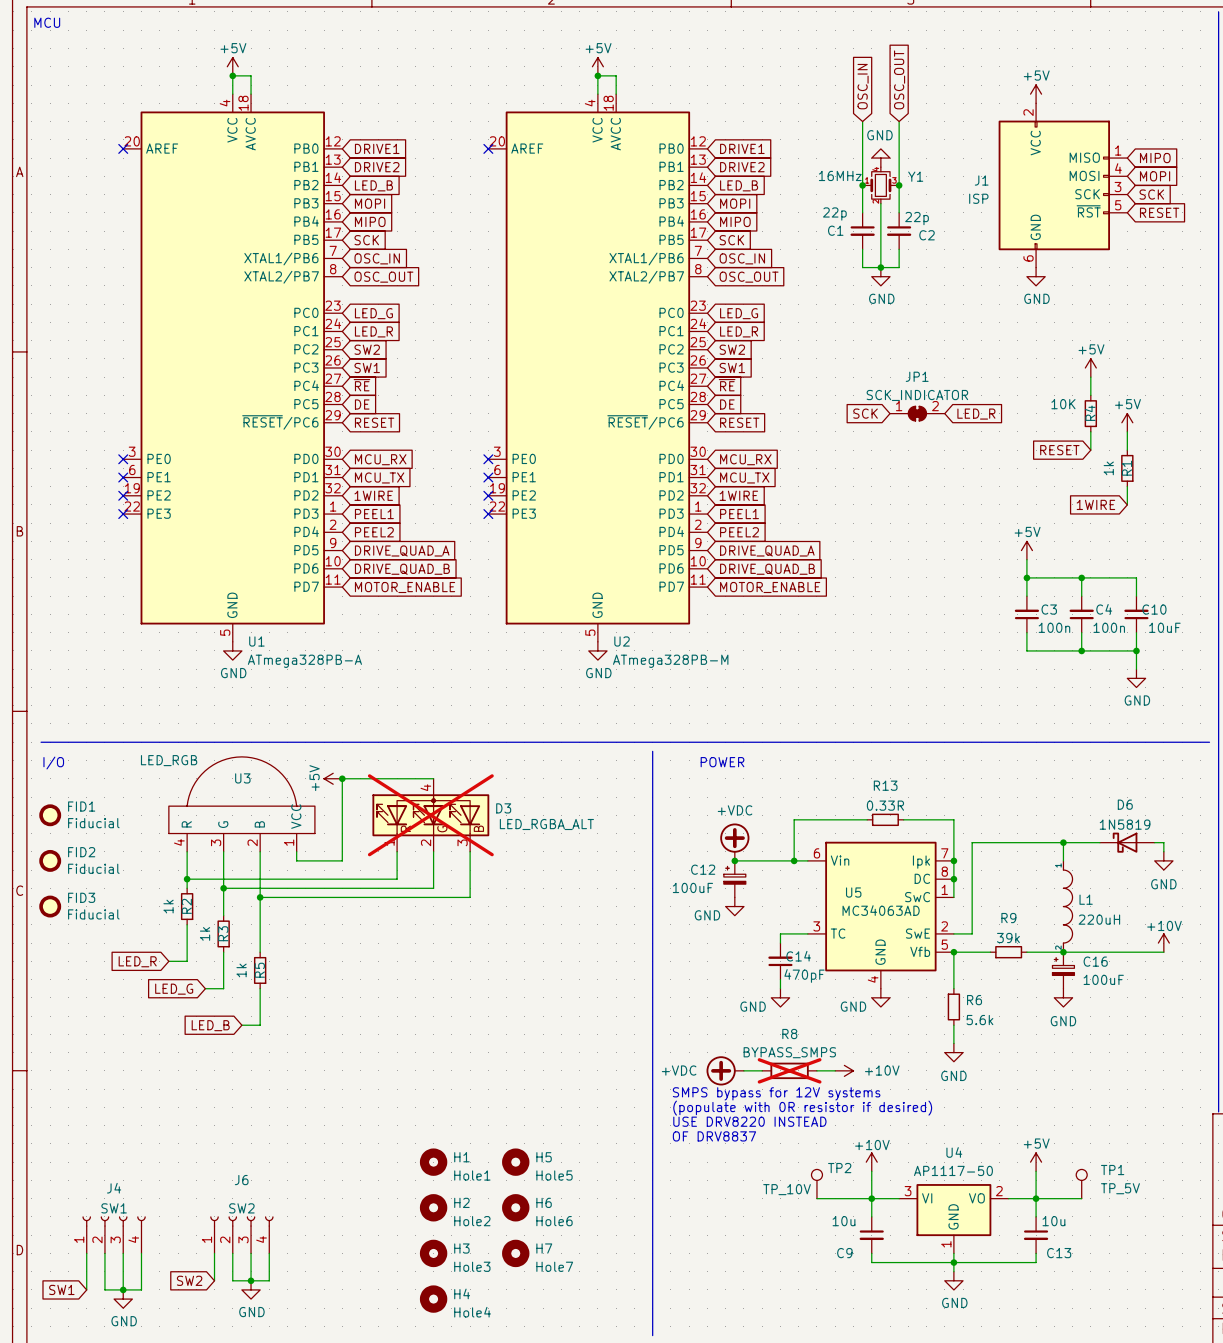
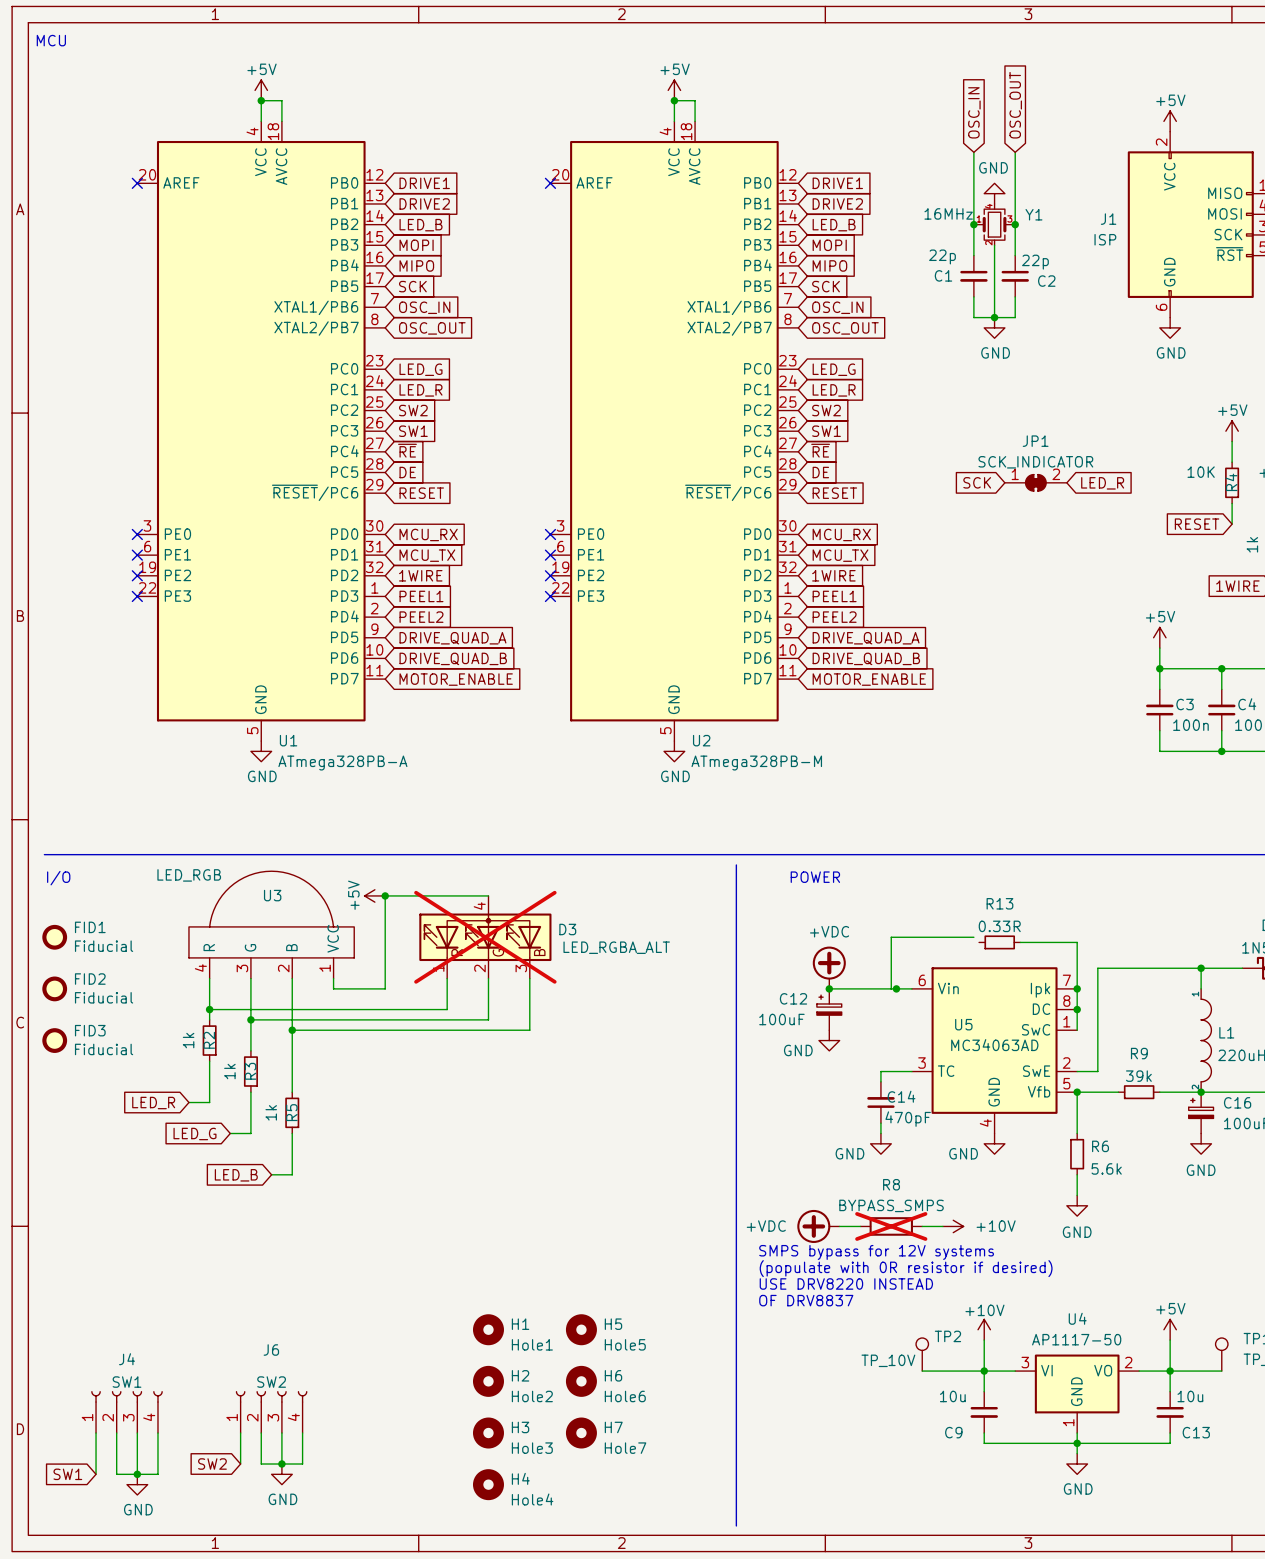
wire: none -> (973, 937) (891, 937) (891, 988)
wire: (867, 819) (794, 819) (794, 860) -> none

